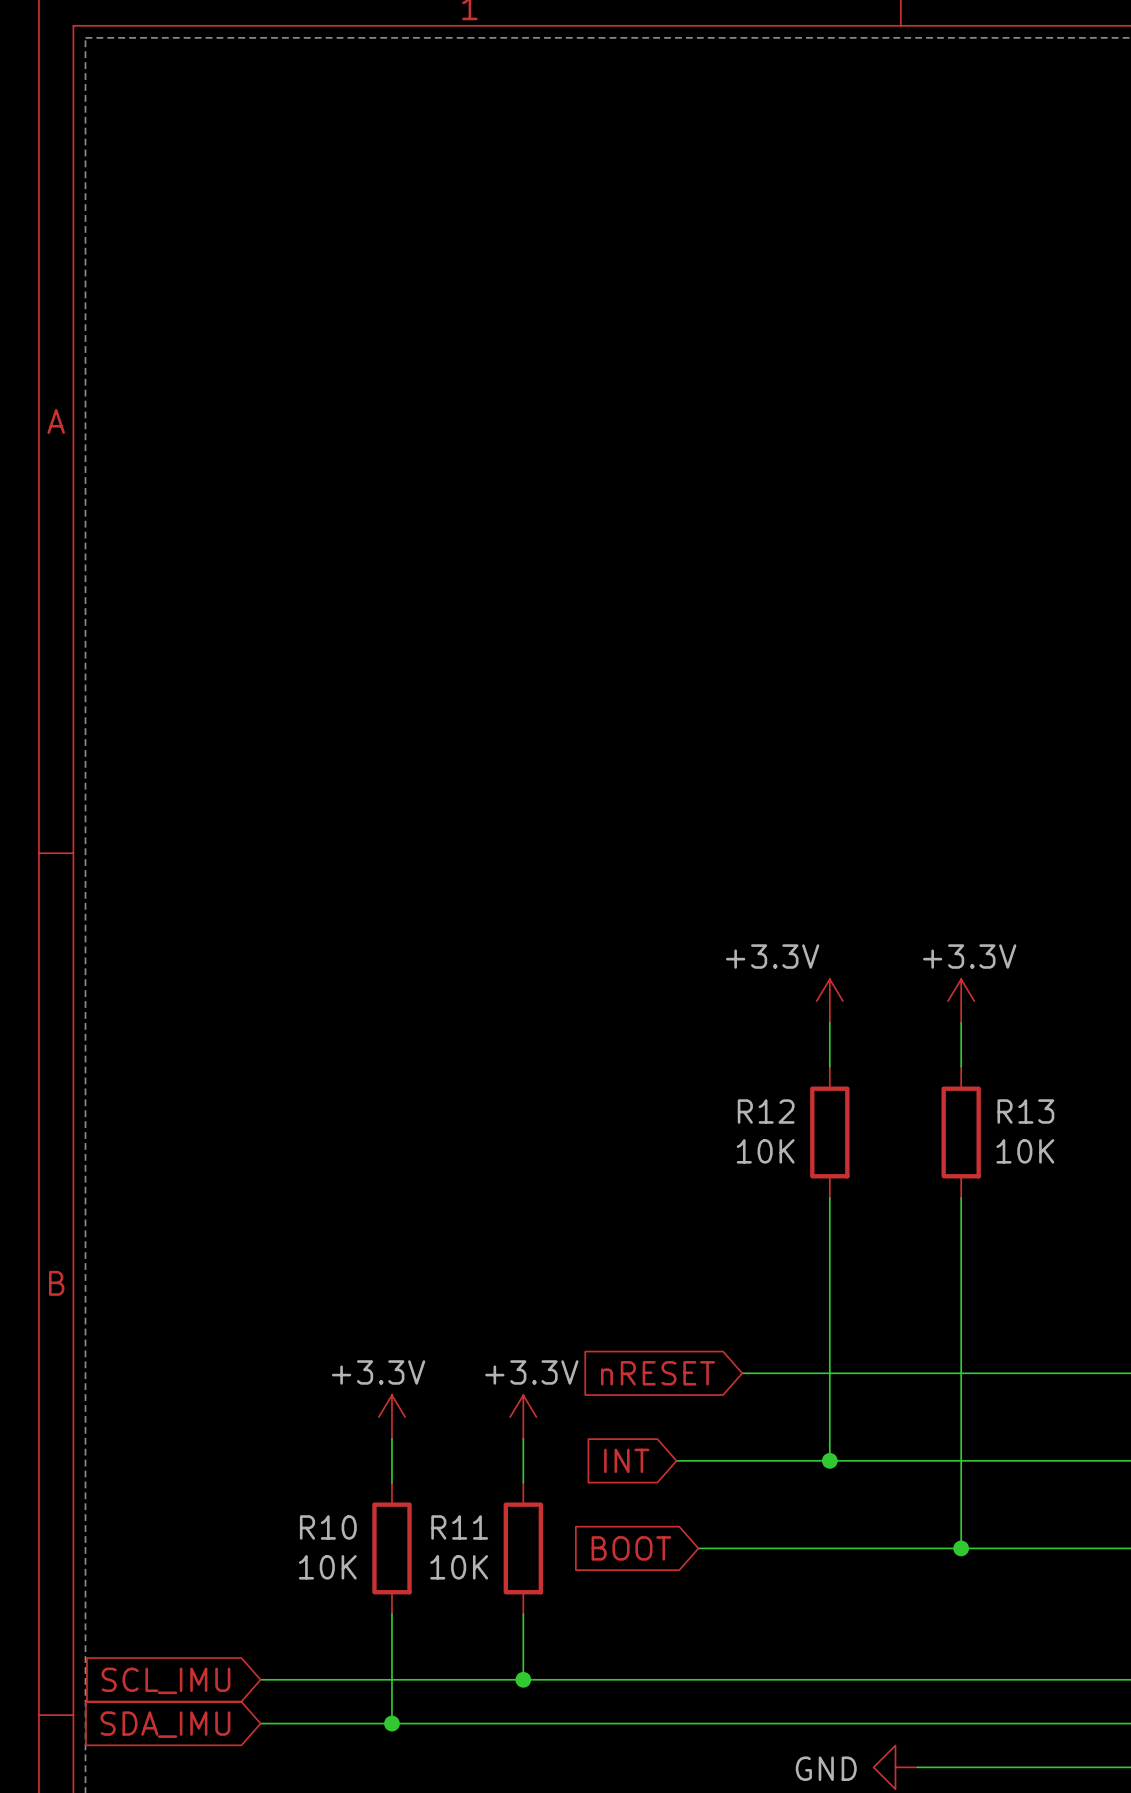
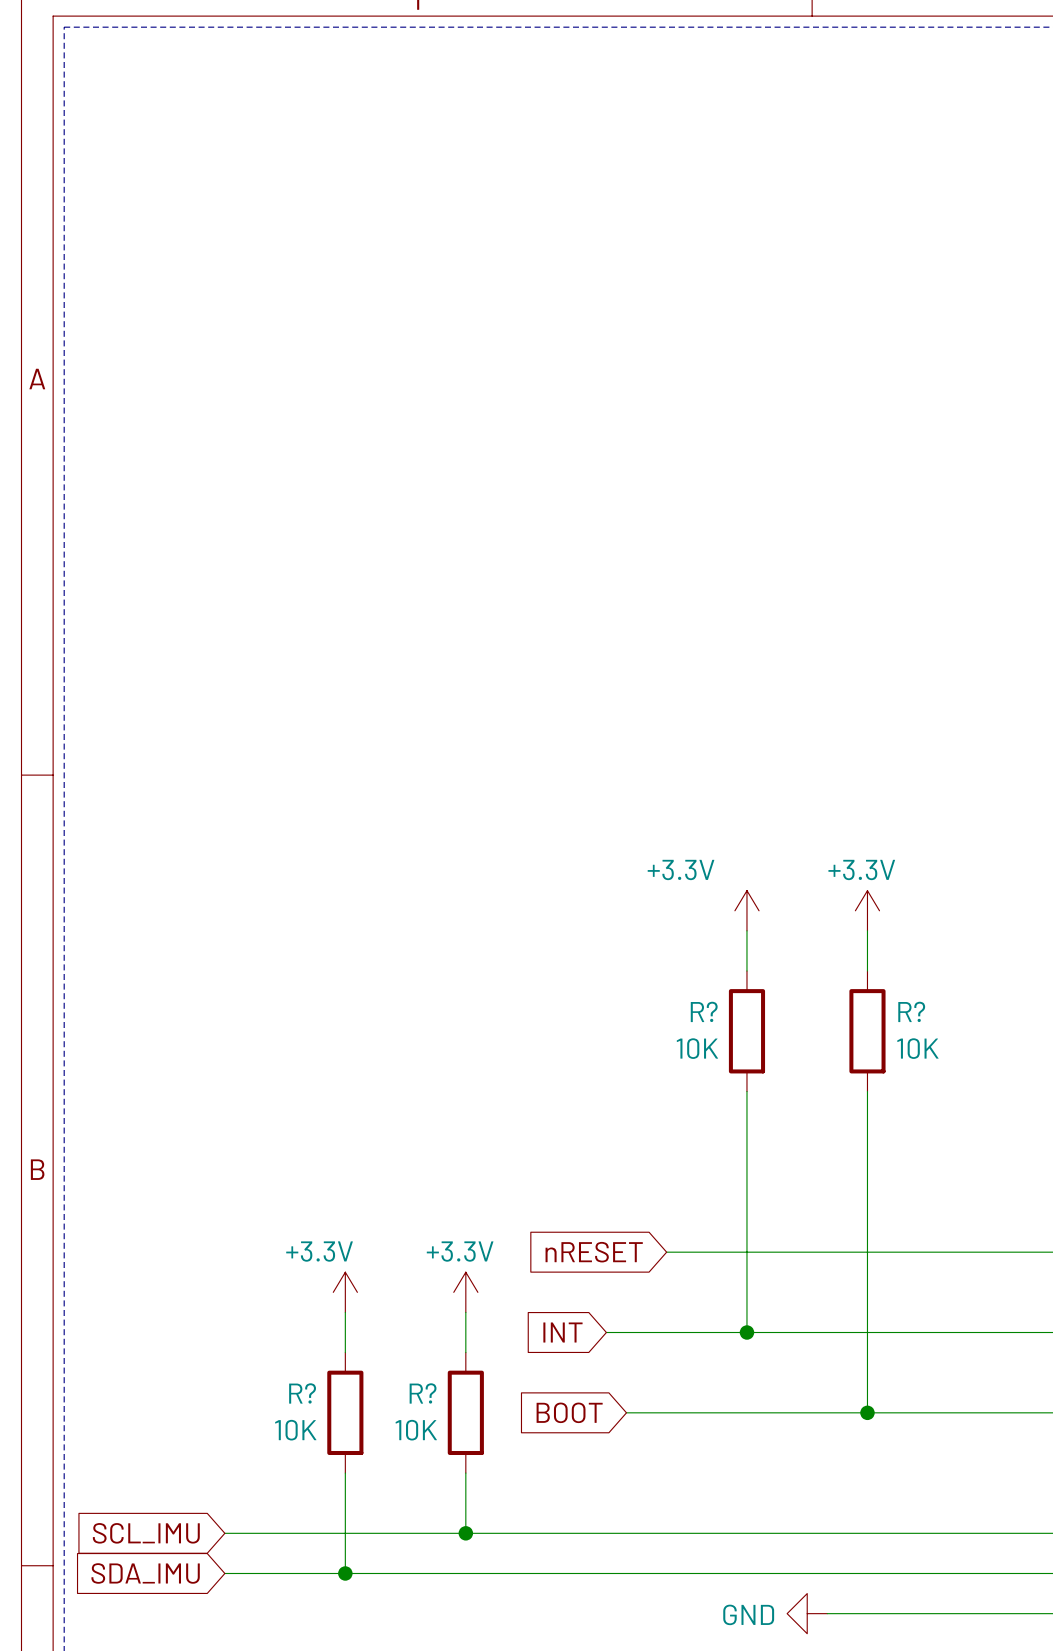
R12 name: R12 (766, 1111) -> R? (704, 1011)
R13 name: R13 (1025, 1111) -> R? (911, 1011)
R10 name: R10 (328, 1527) -> R? (302, 1393)
R11 name: R11 (459, 1527) -> R? (423, 1393)

